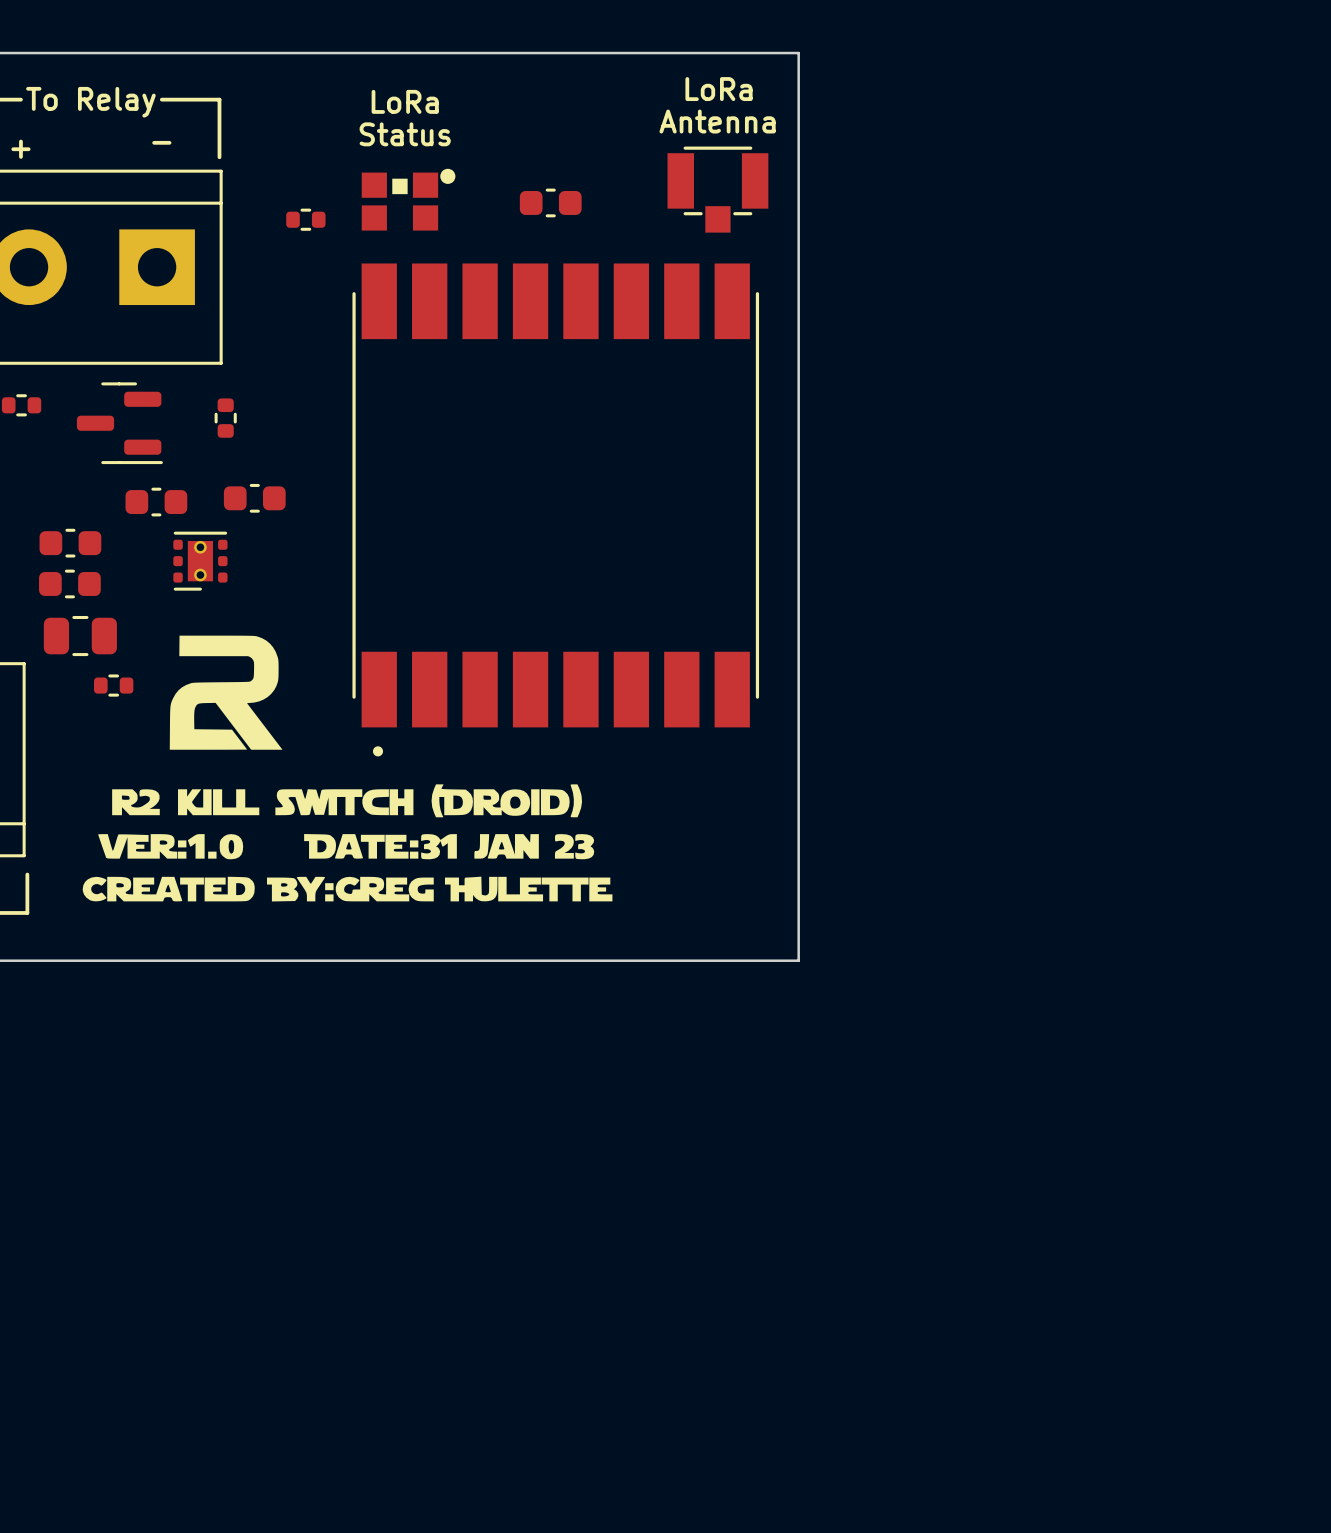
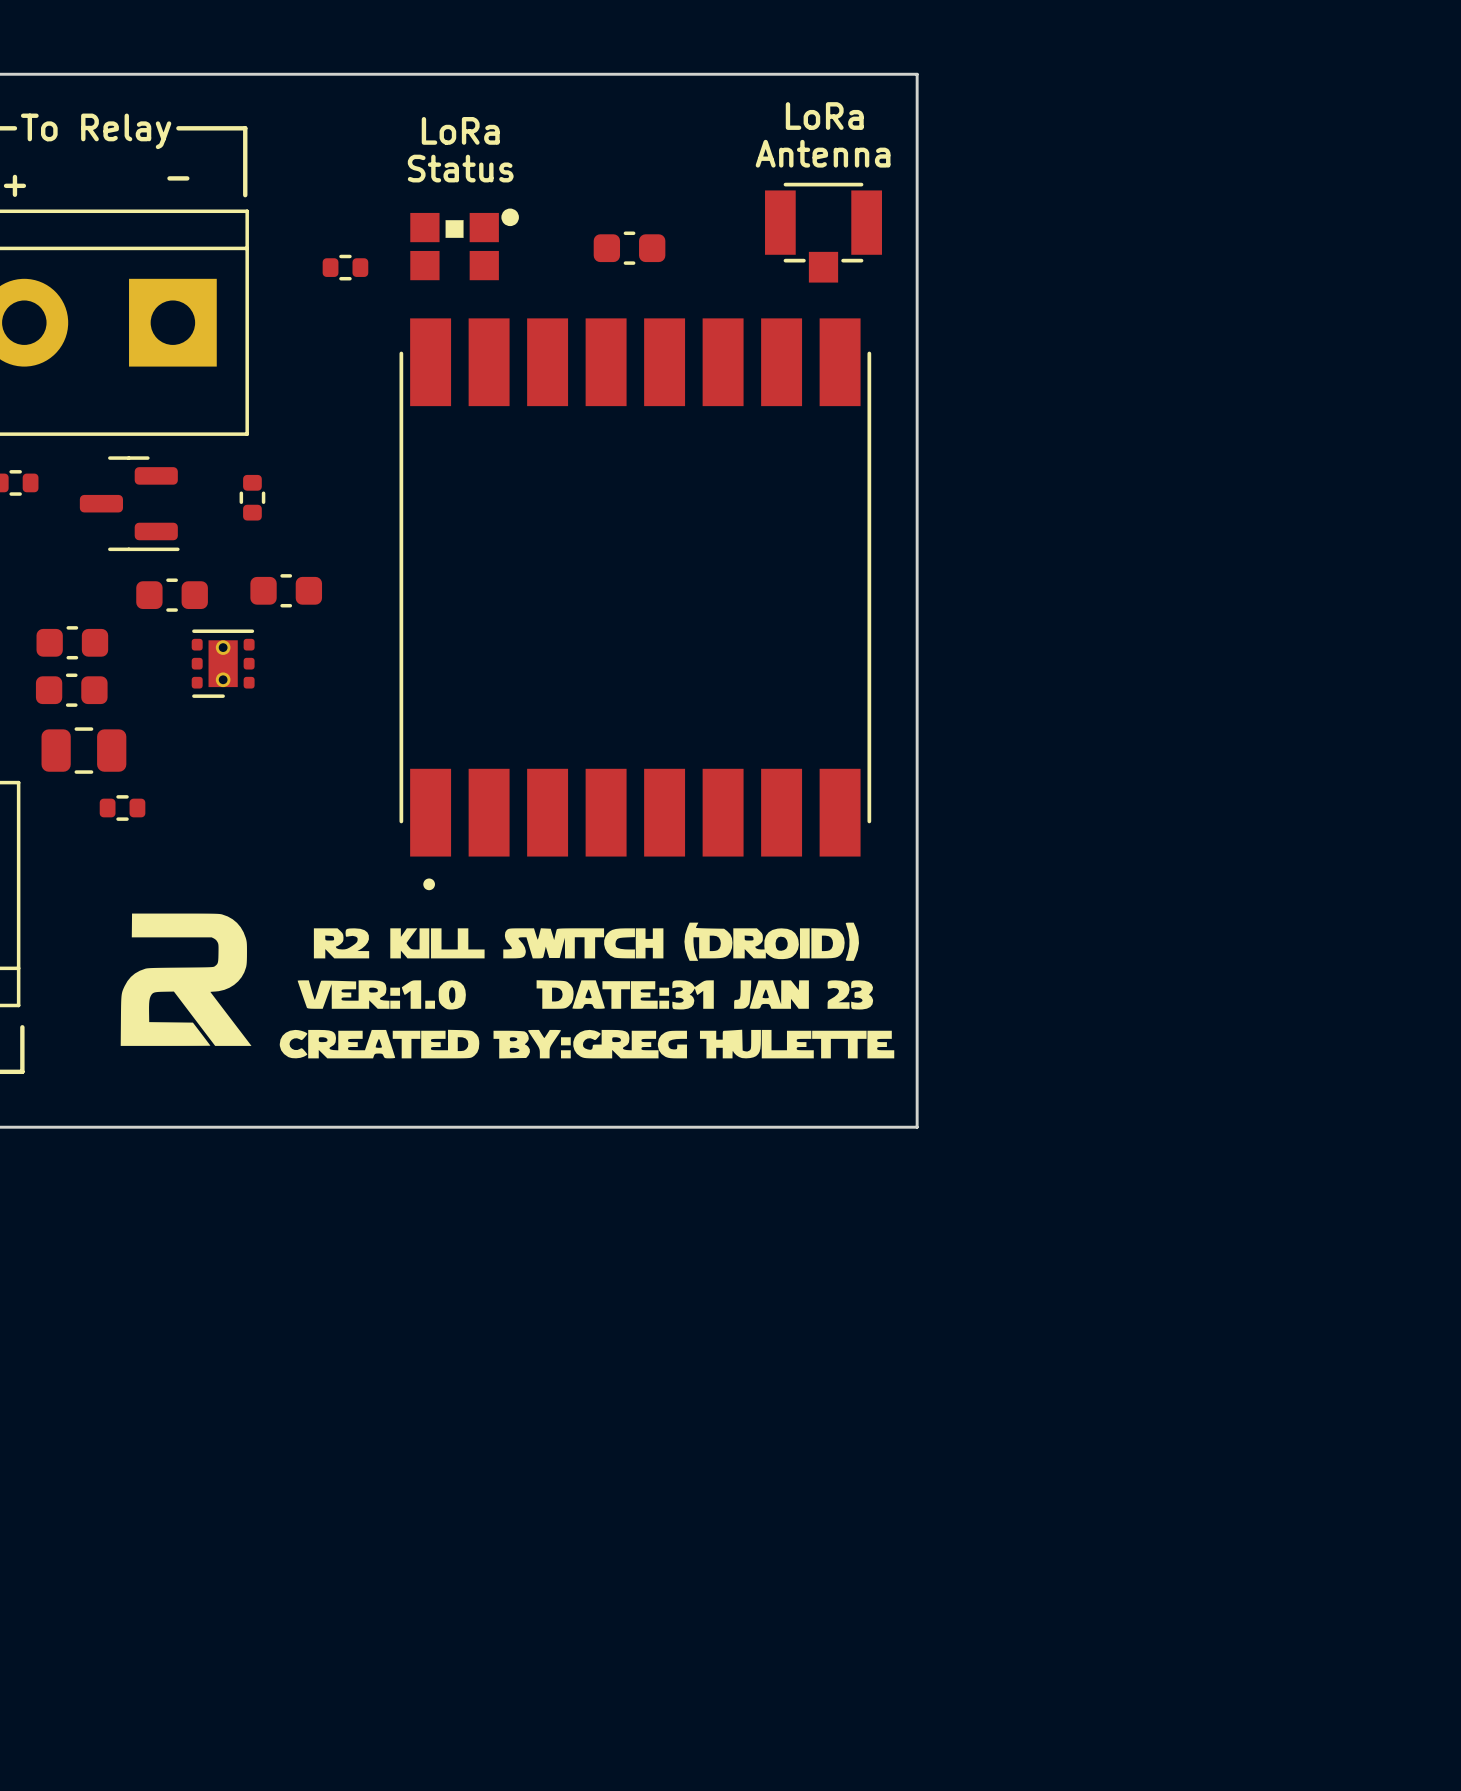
drawing position: (226, 692) -> (186, 979)
drawing position: (347, 842) -> (587, 990)

